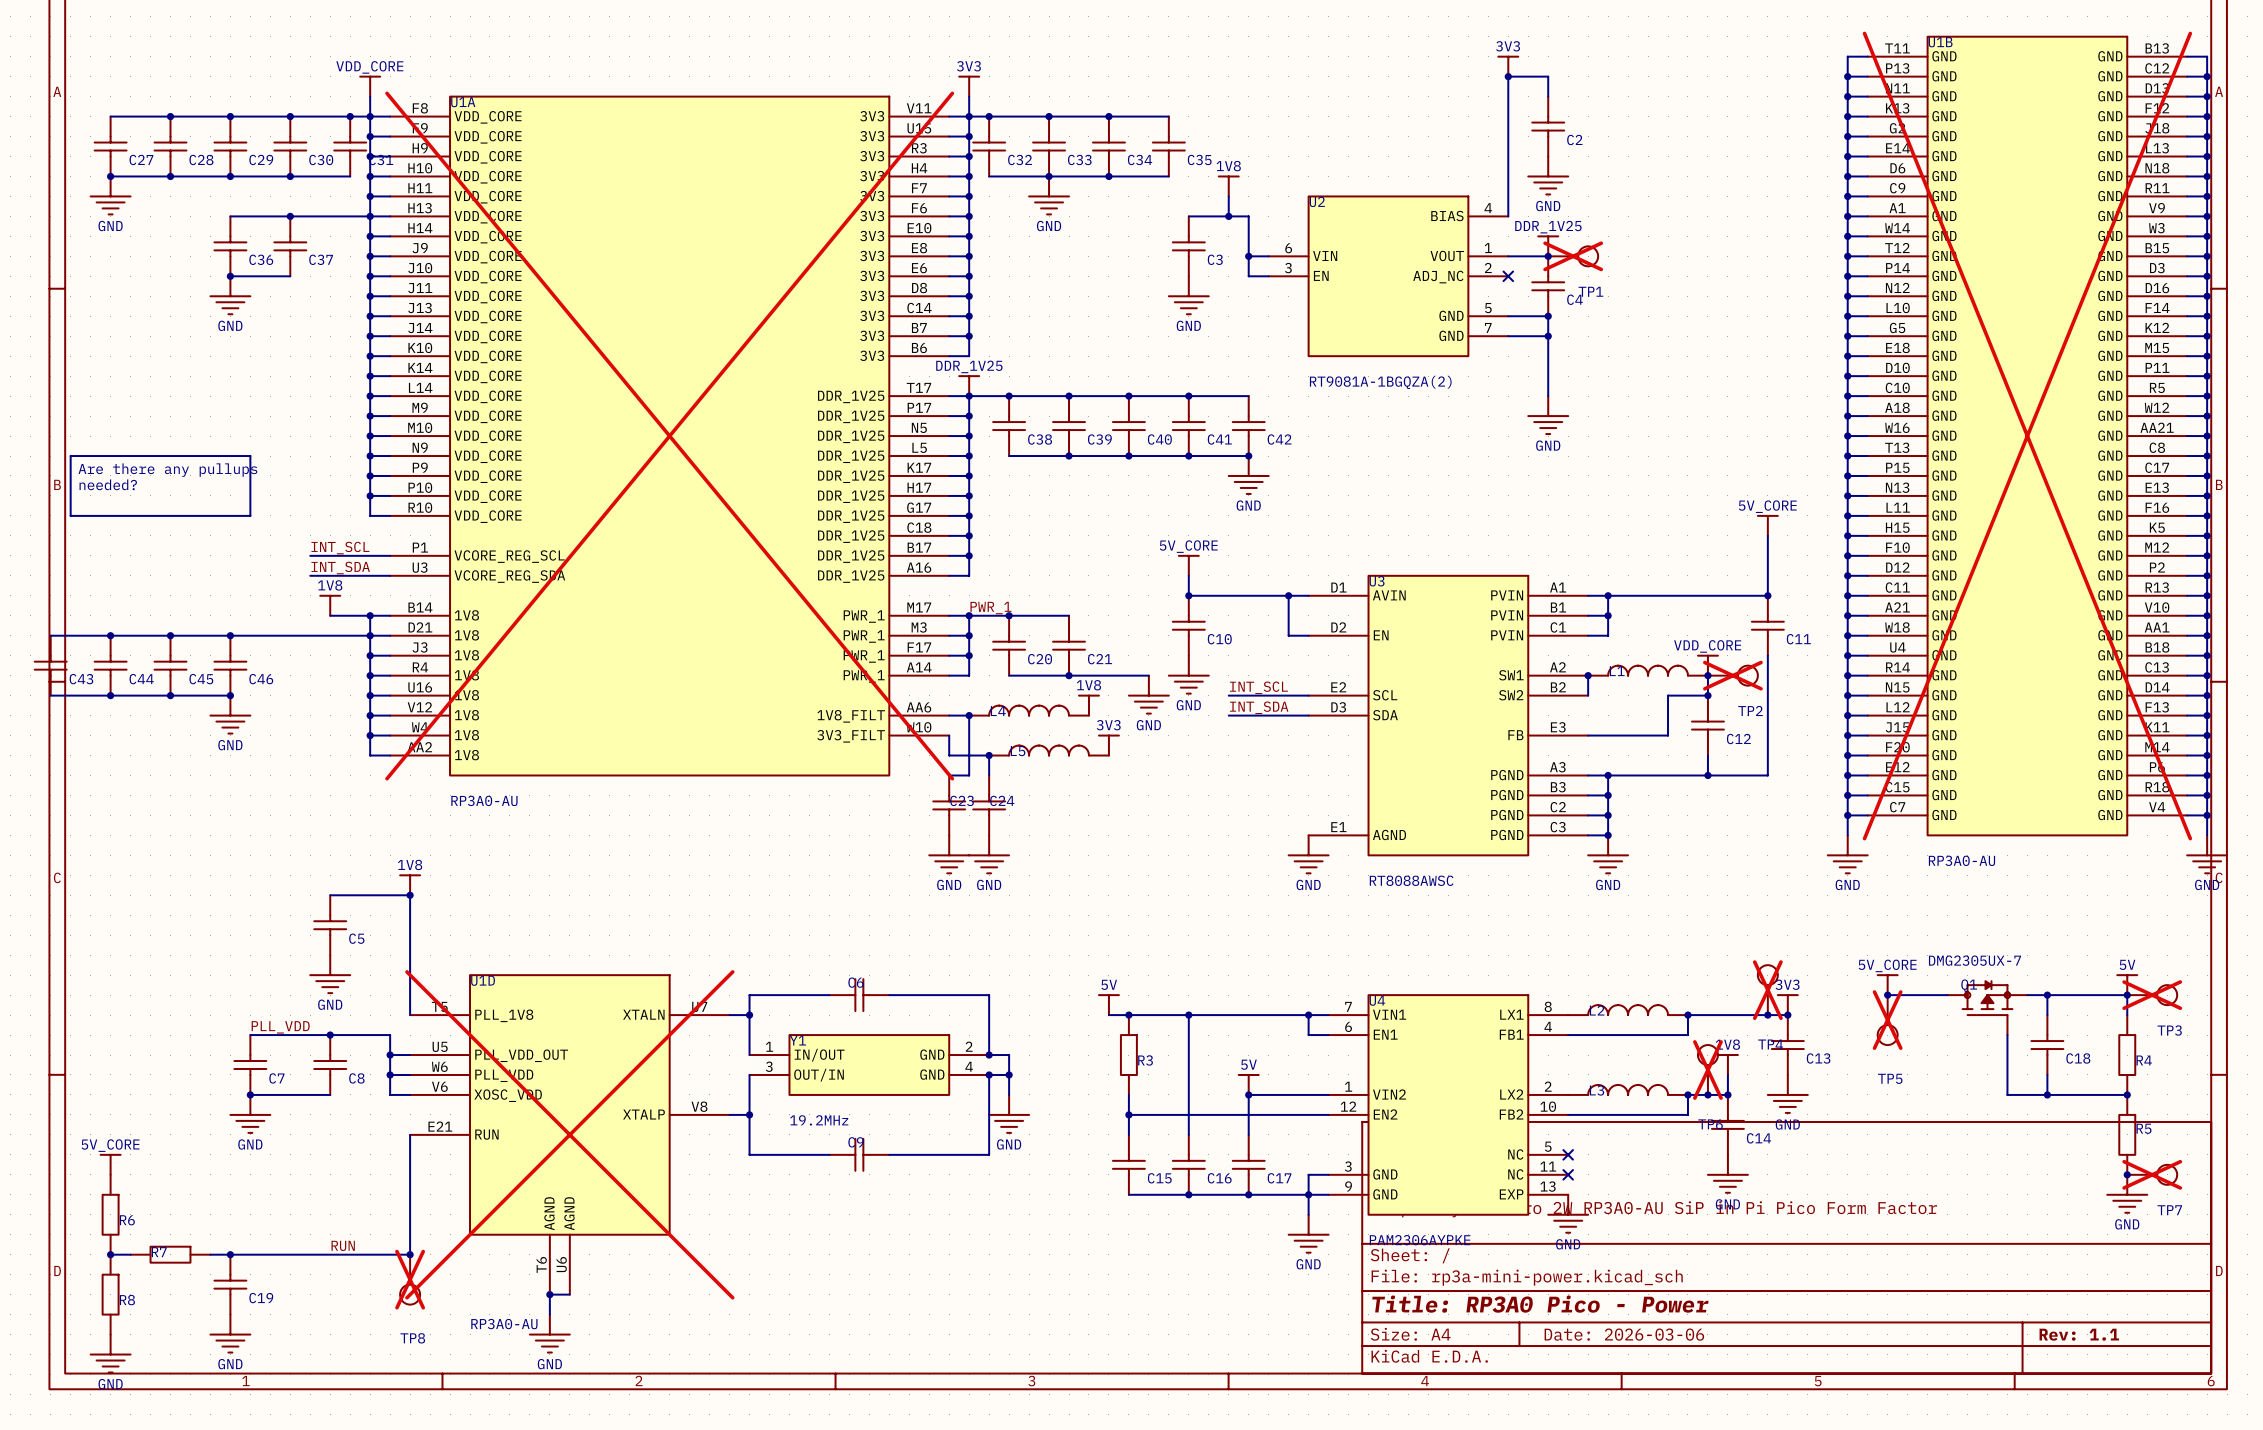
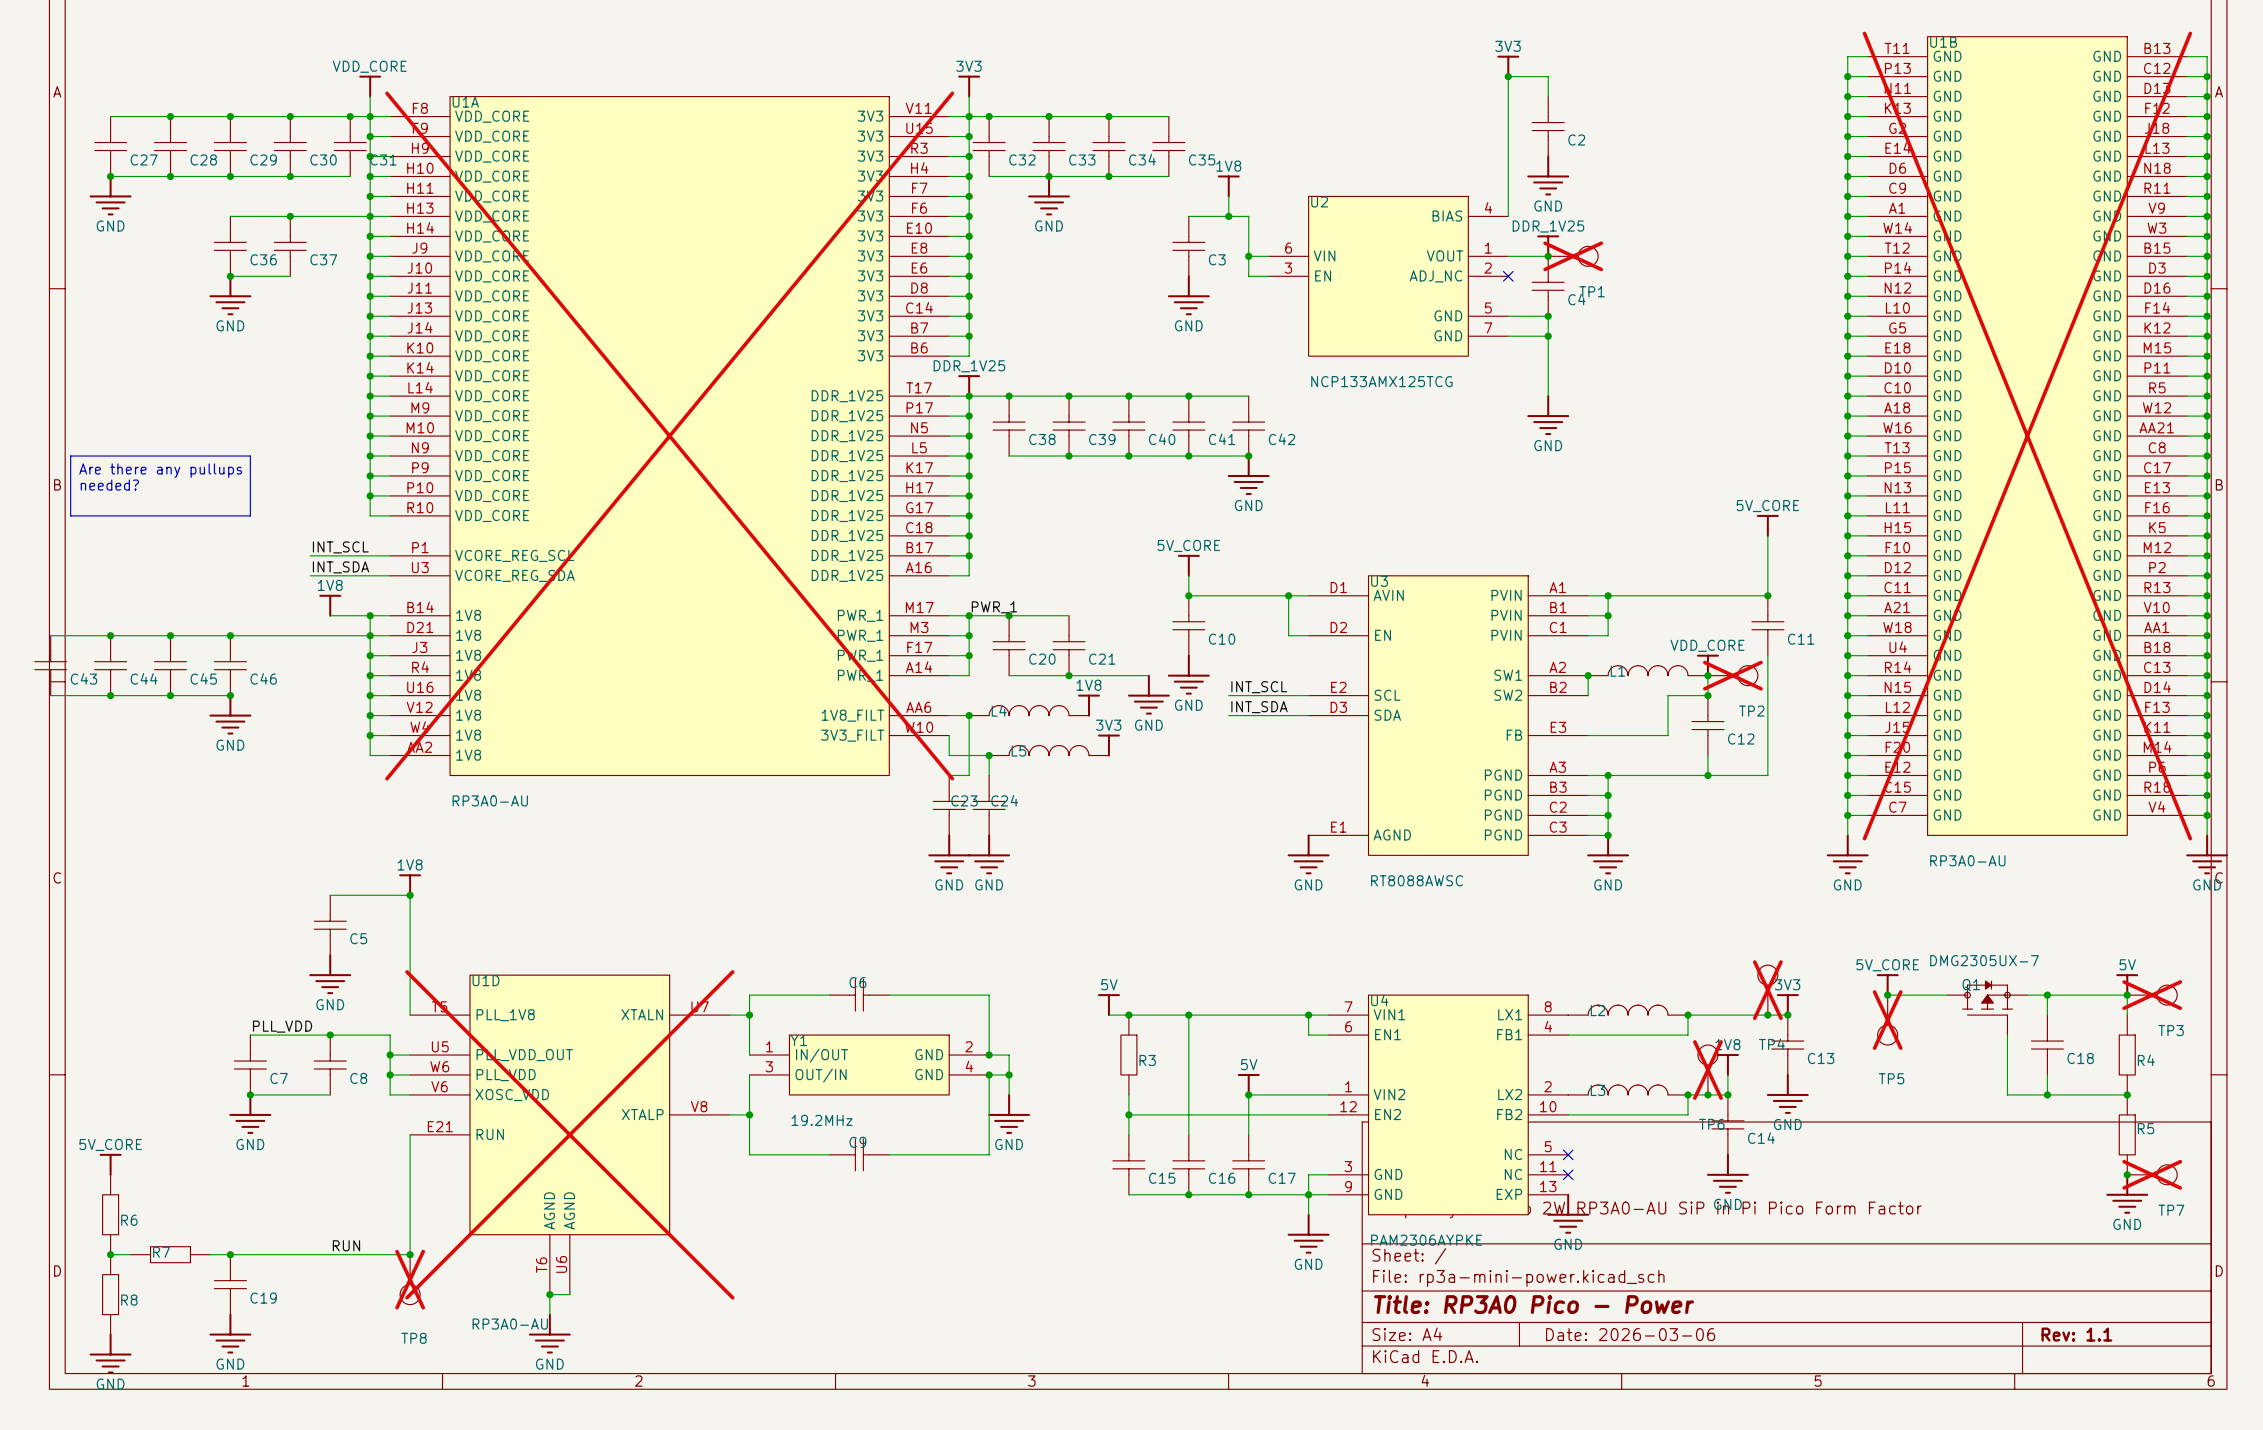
U2 value: RT9081A-1BGQZA(2) (1380, 382) -> NCP133AMX125TCG (1381, 381)

